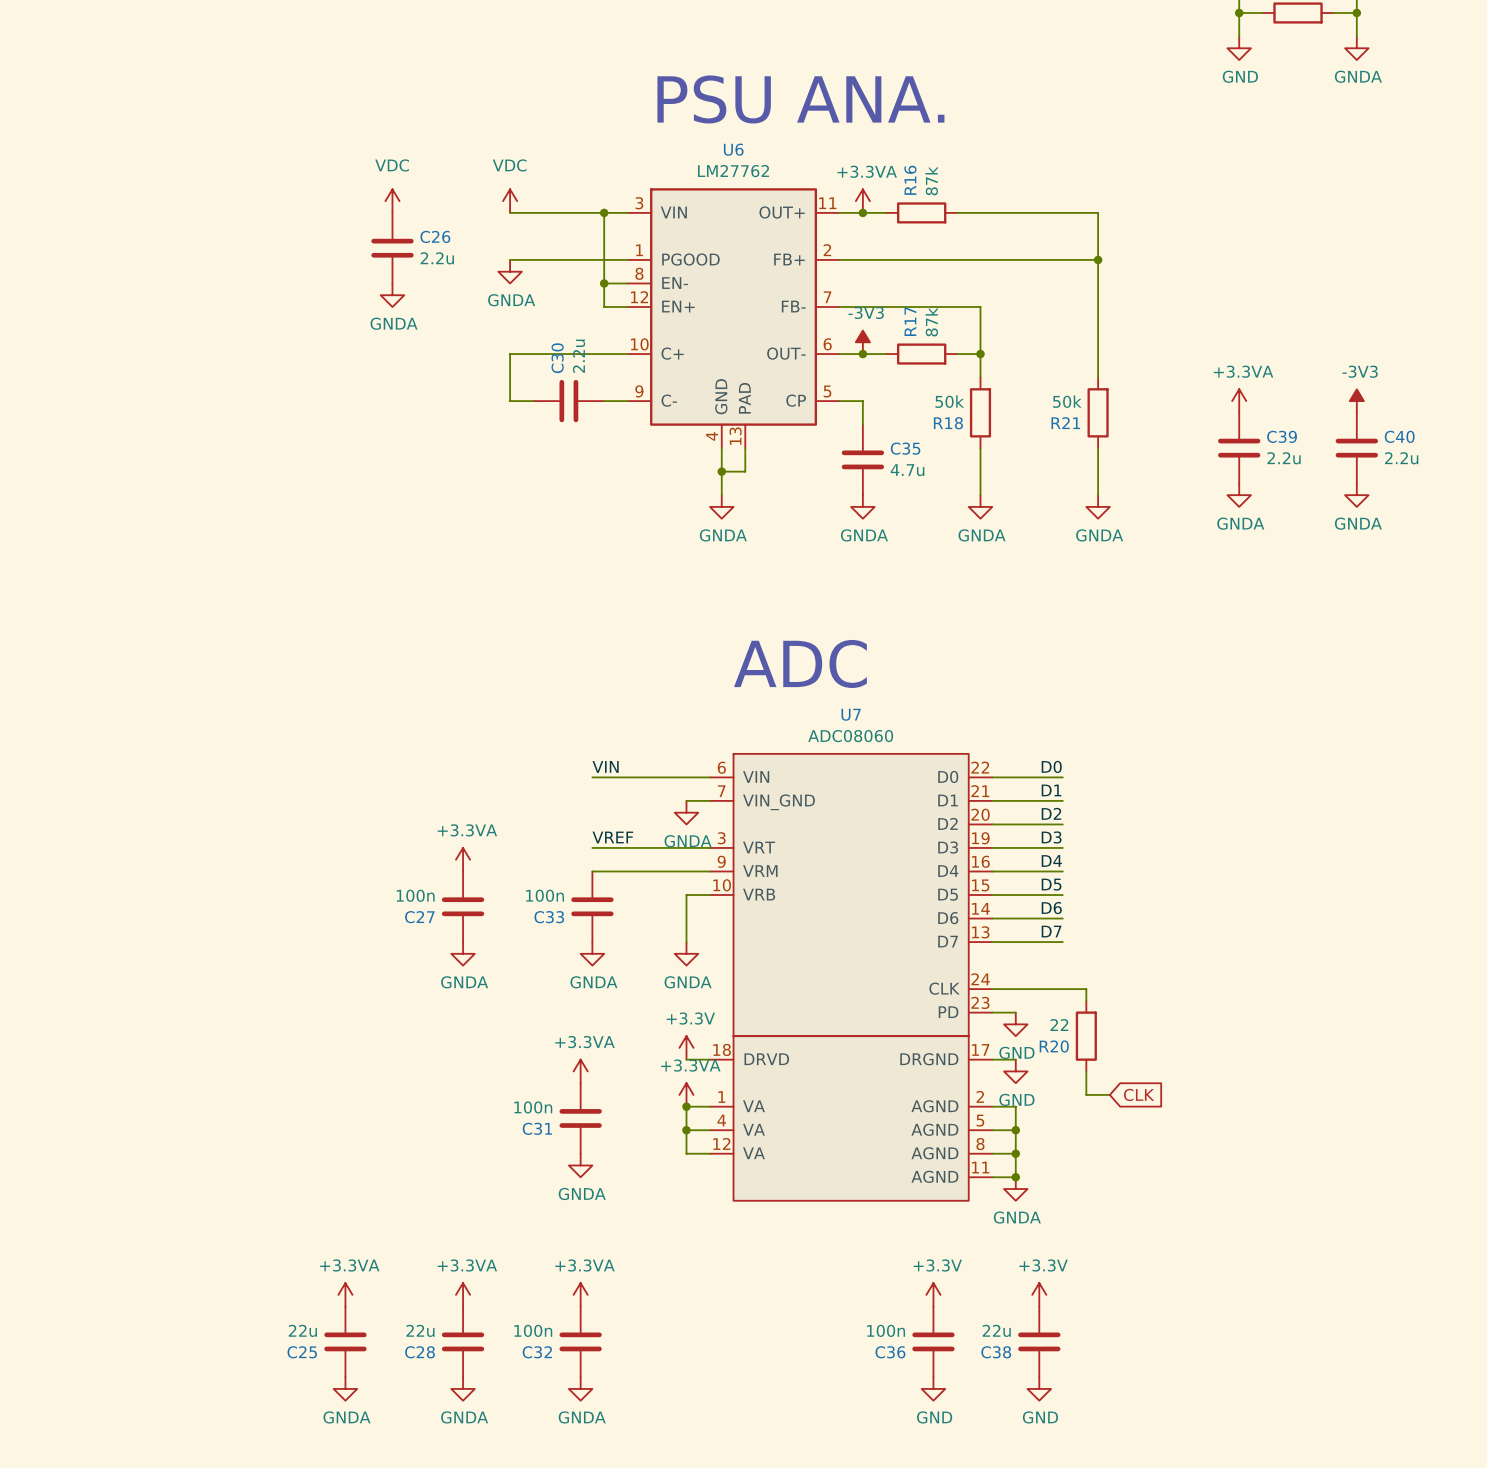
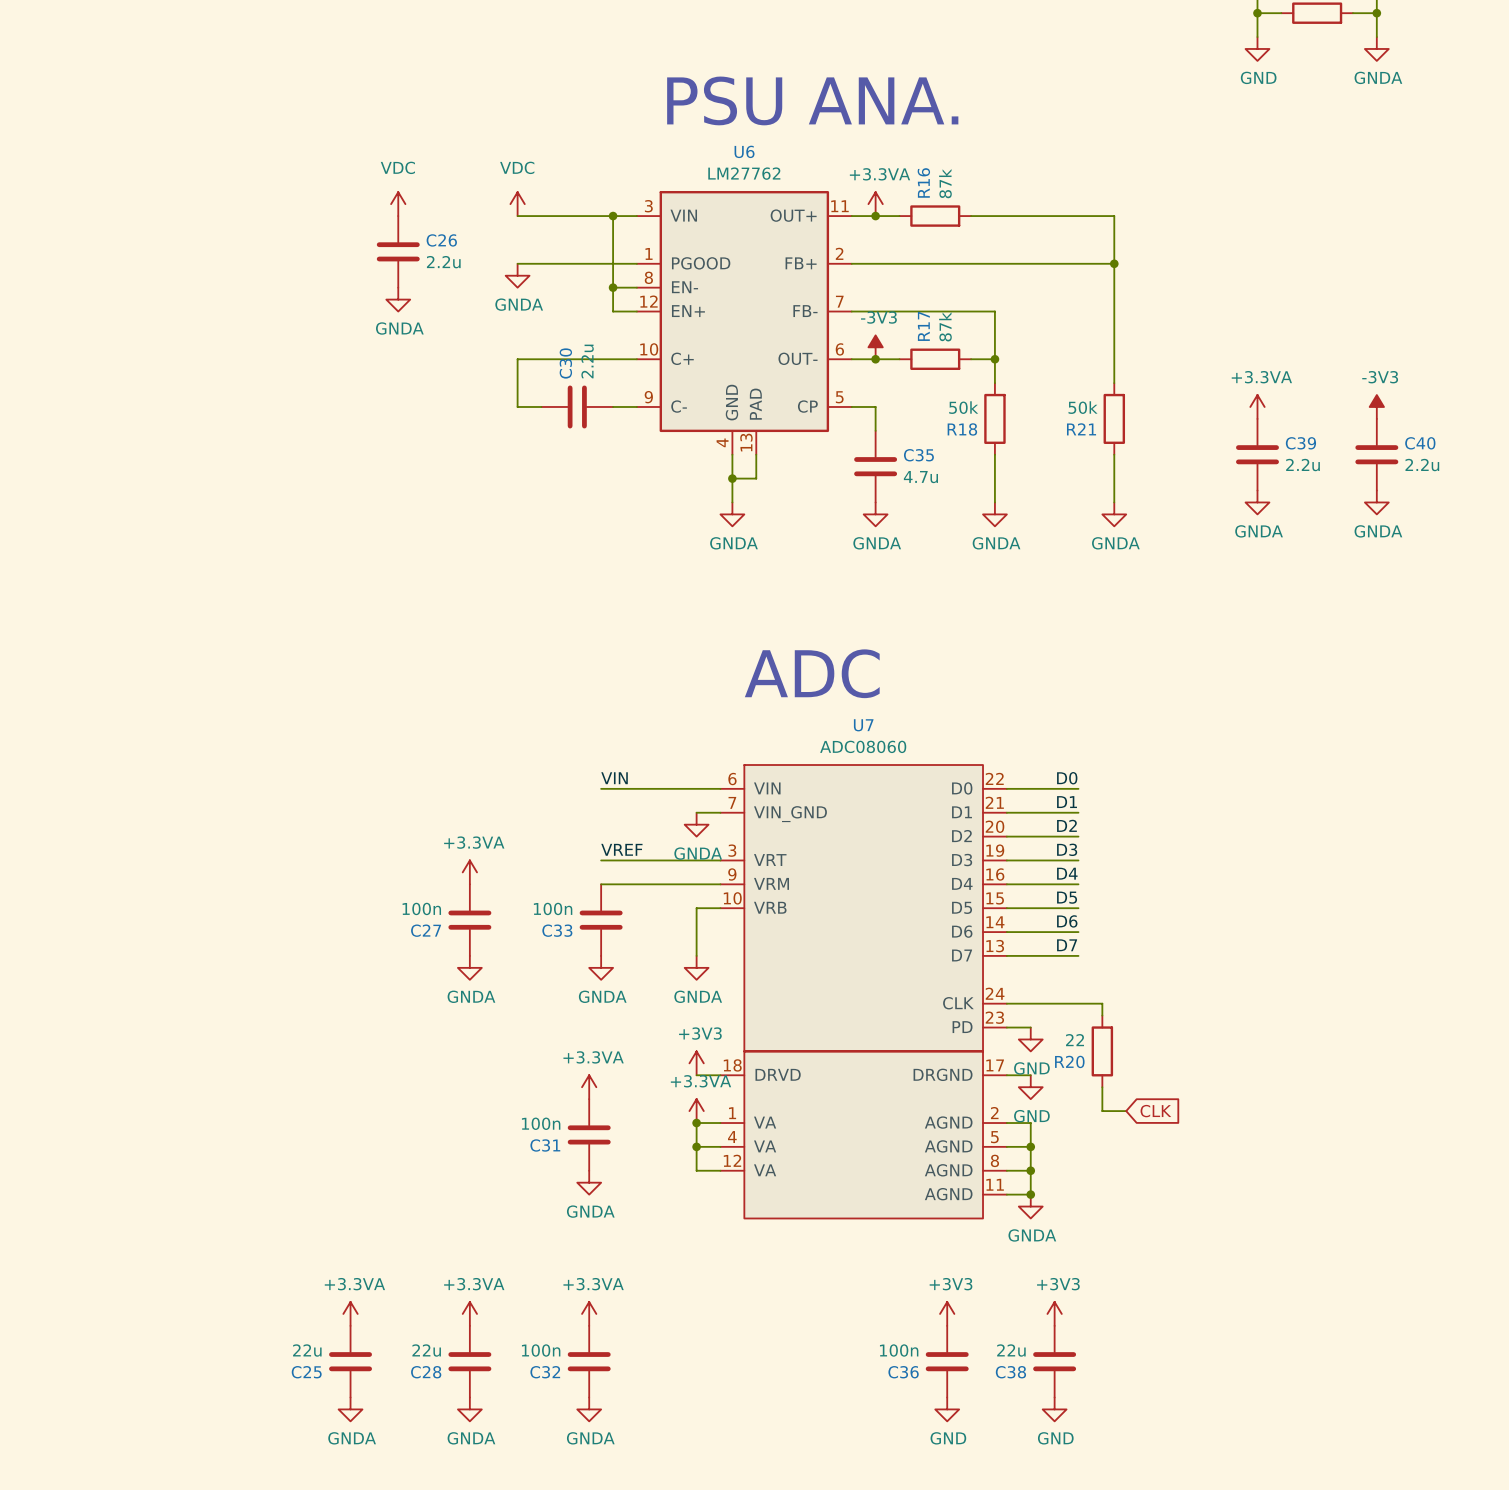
power symbol: +3.3V (686, 1047) -> +3V3 (696, 1063)
power symbol: +3.3V (933, 1294) -> +3V3 (947, 1313)
power symbol: +3.3V (1039, 1294) -> +3V3 (1054, 1313)

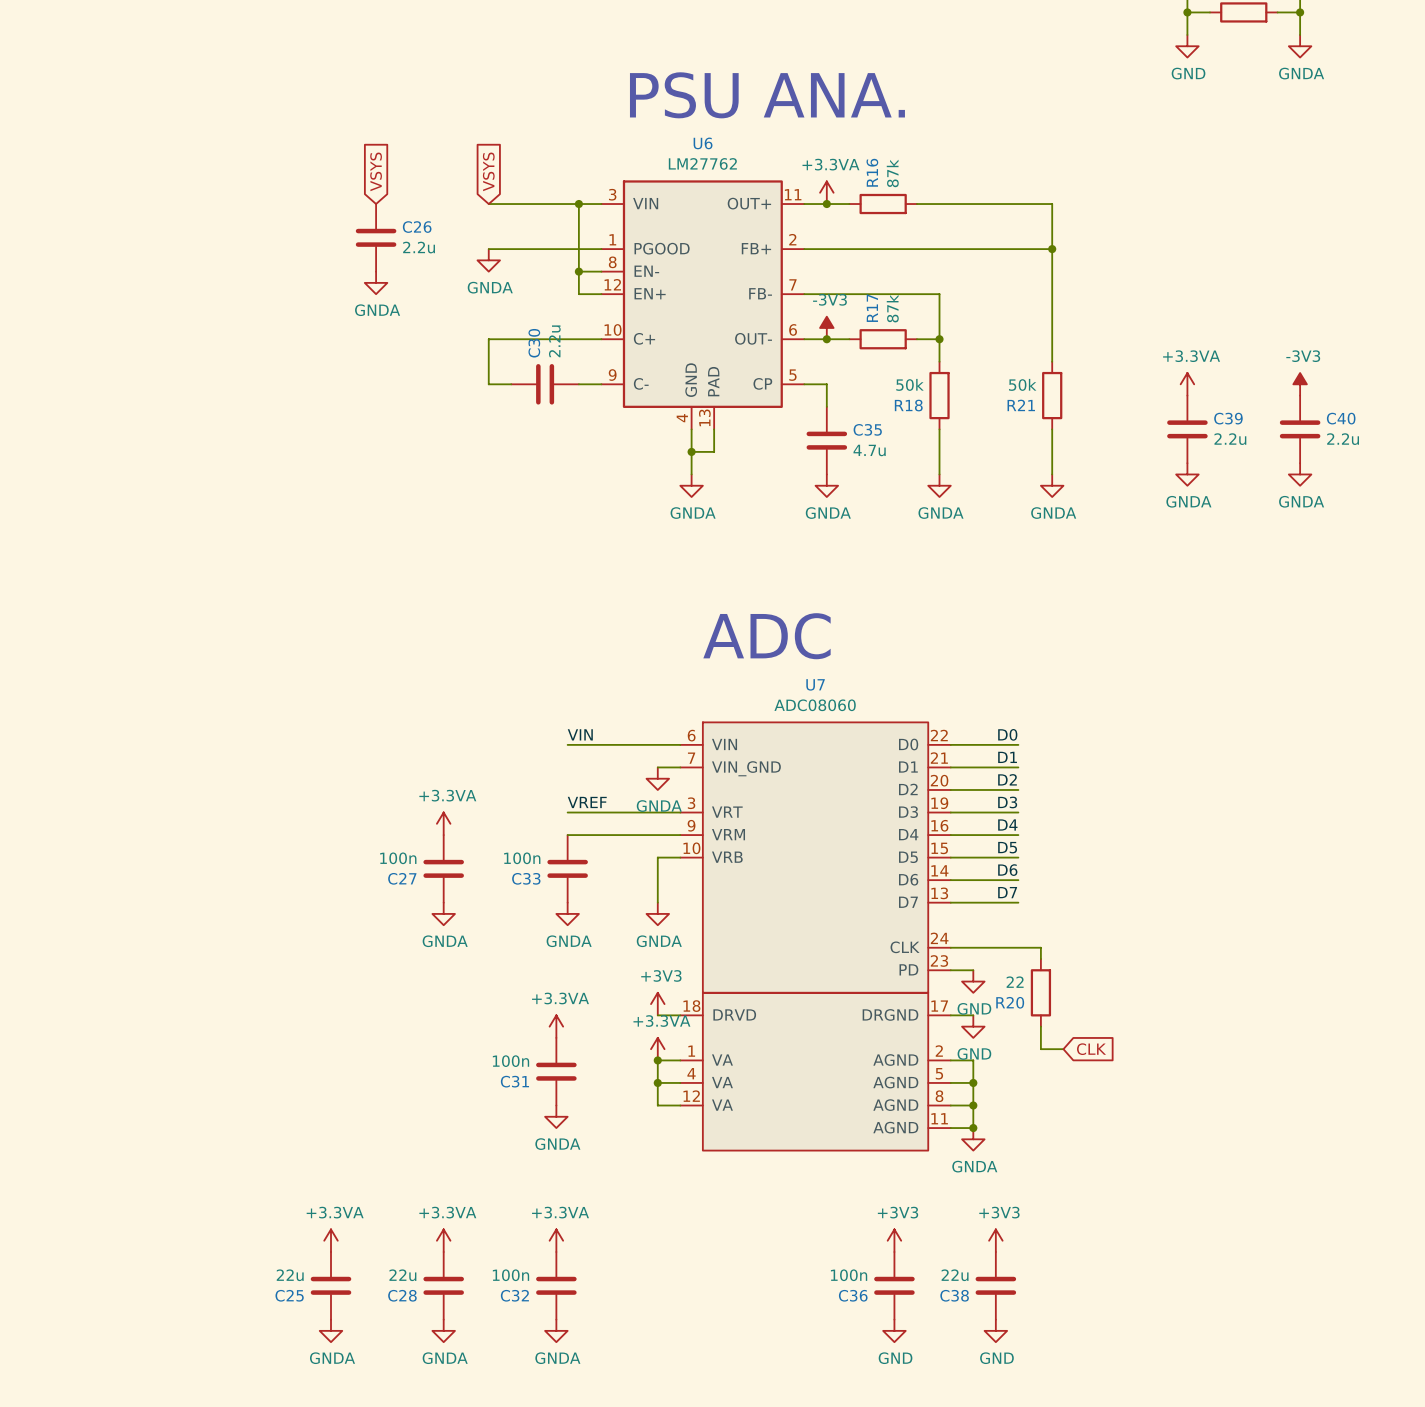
global label: none -> VSYS (376, 171)
global label: none -> VSYS (488, 171)
power symbol: VDC (398, 204) -> none
power symbol: VDC (517, 204) -> none

